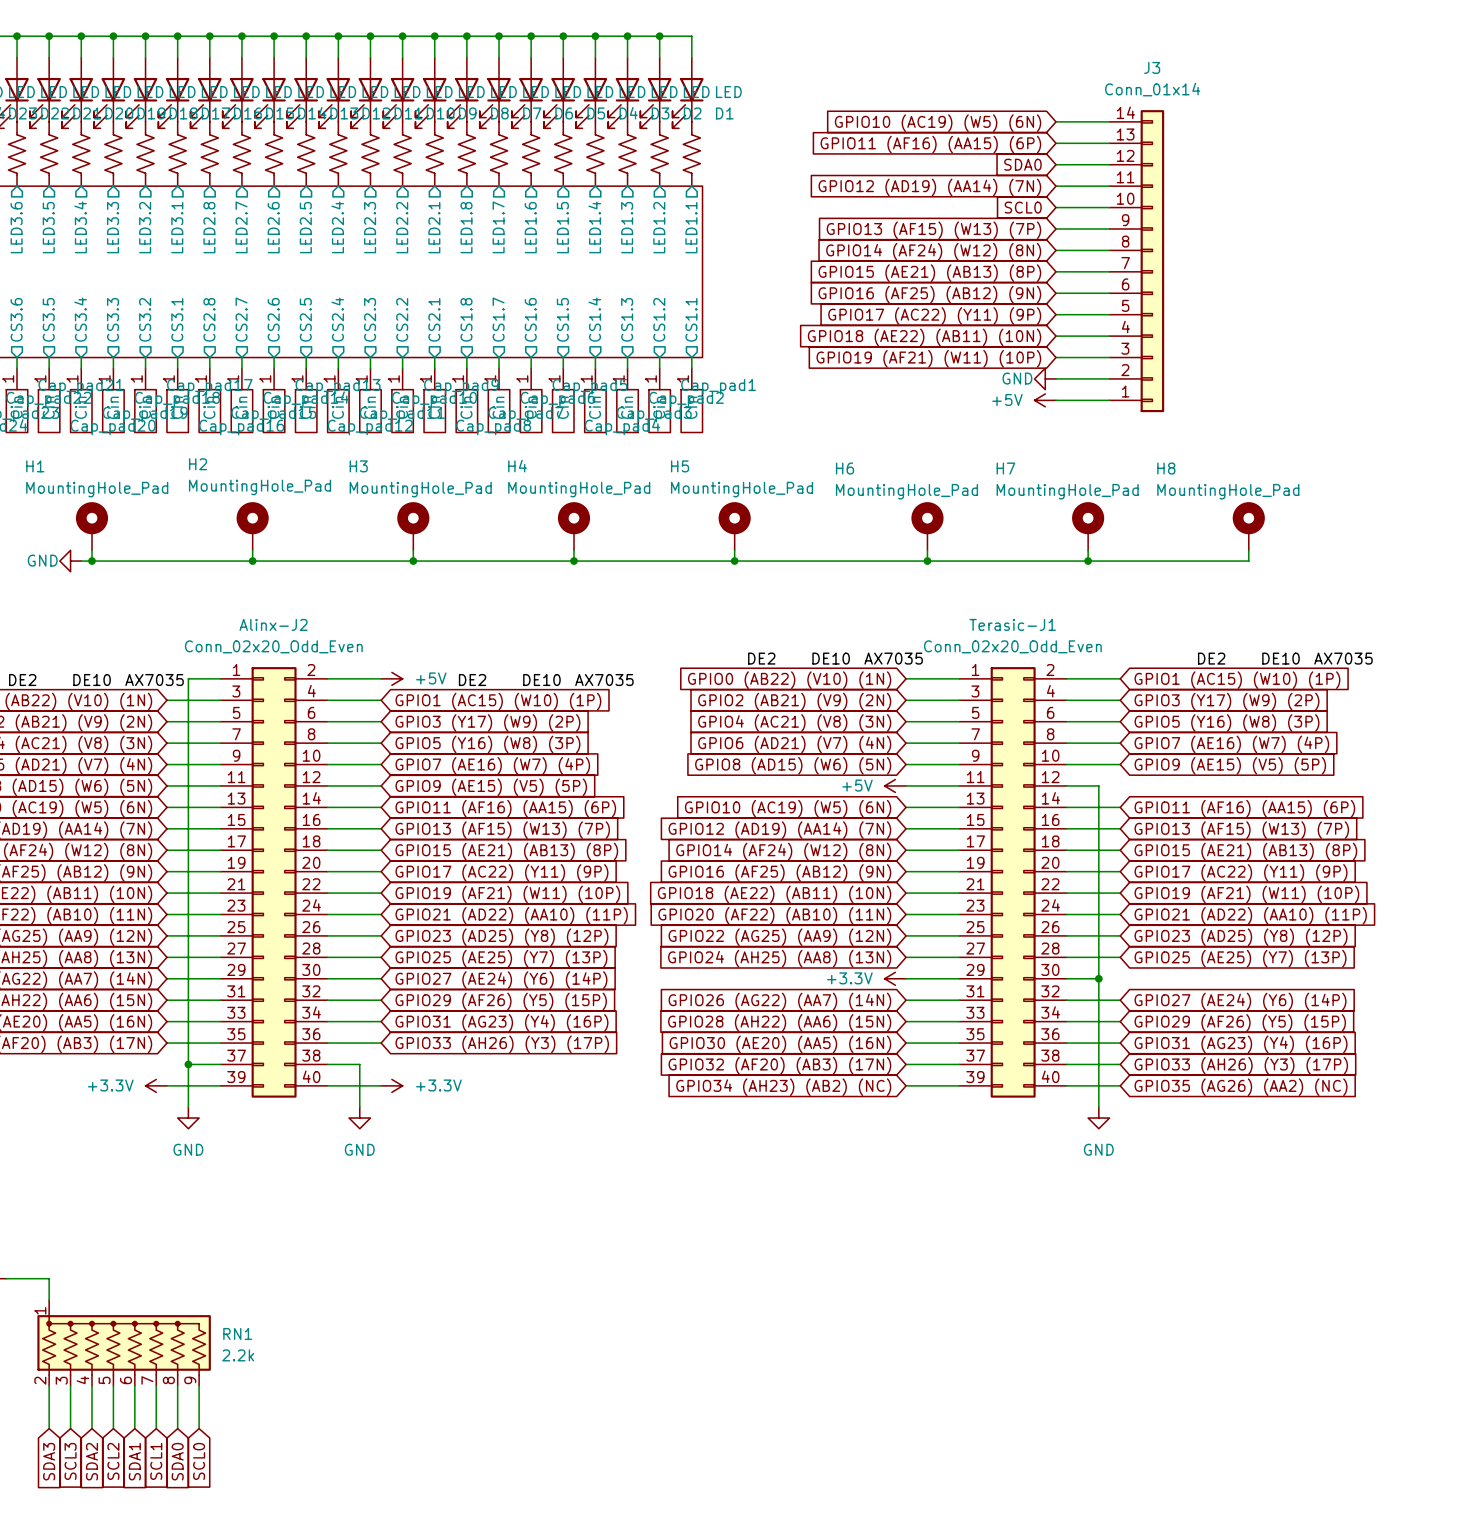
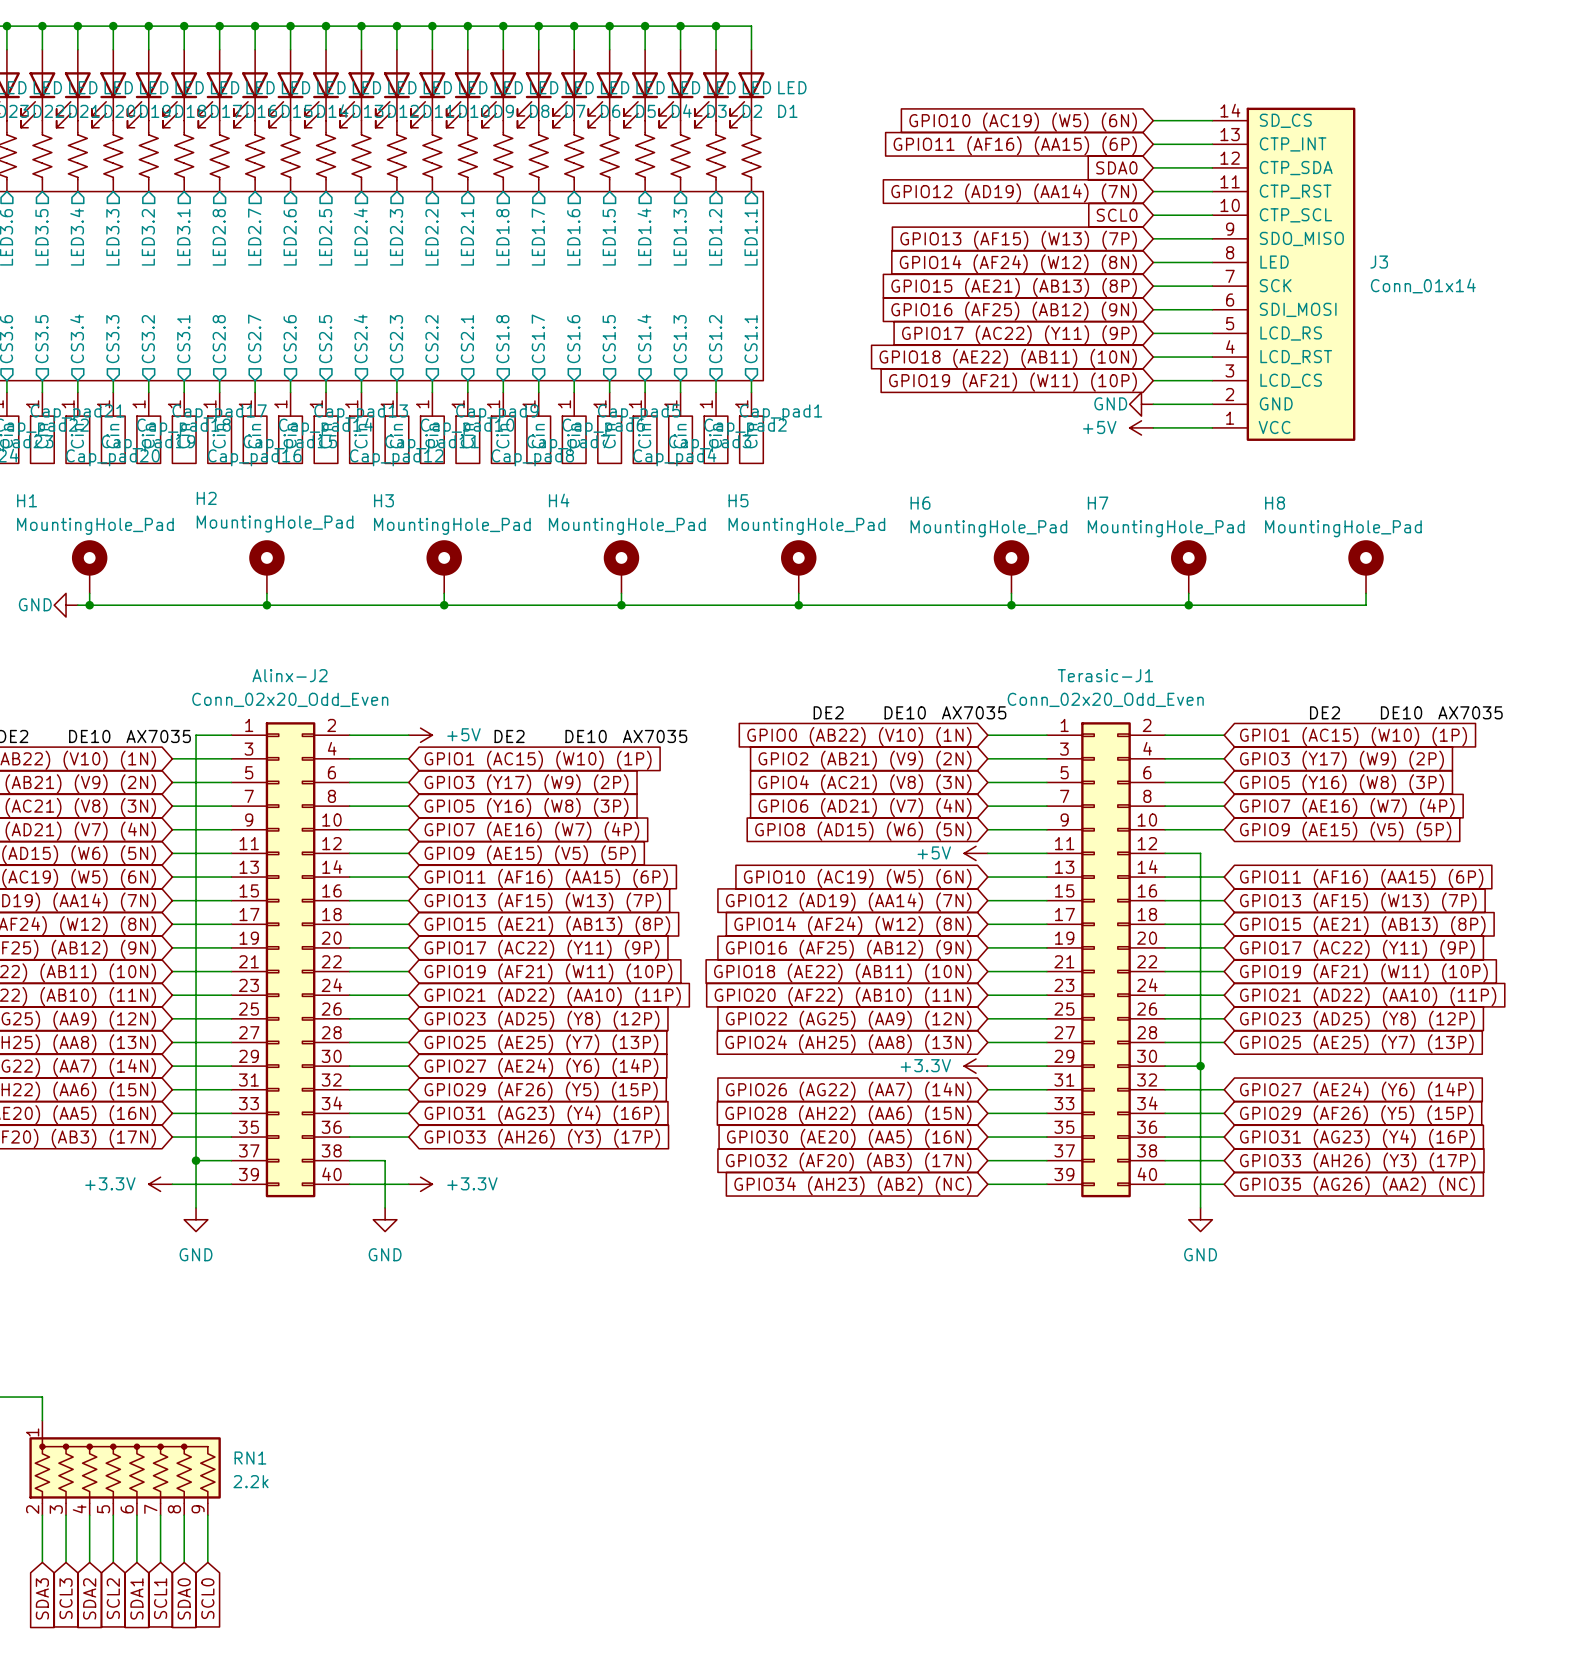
J3 name position: J3 (1152, 67) -> J3 (1379, 262)
J3 value position: Conn_01x14 (1152, 89) -> Conn_01x14 (1423, 285)
J3 symbol: [1109, 110, 1165, 413] -> [1212, 107, 1356, 441]

